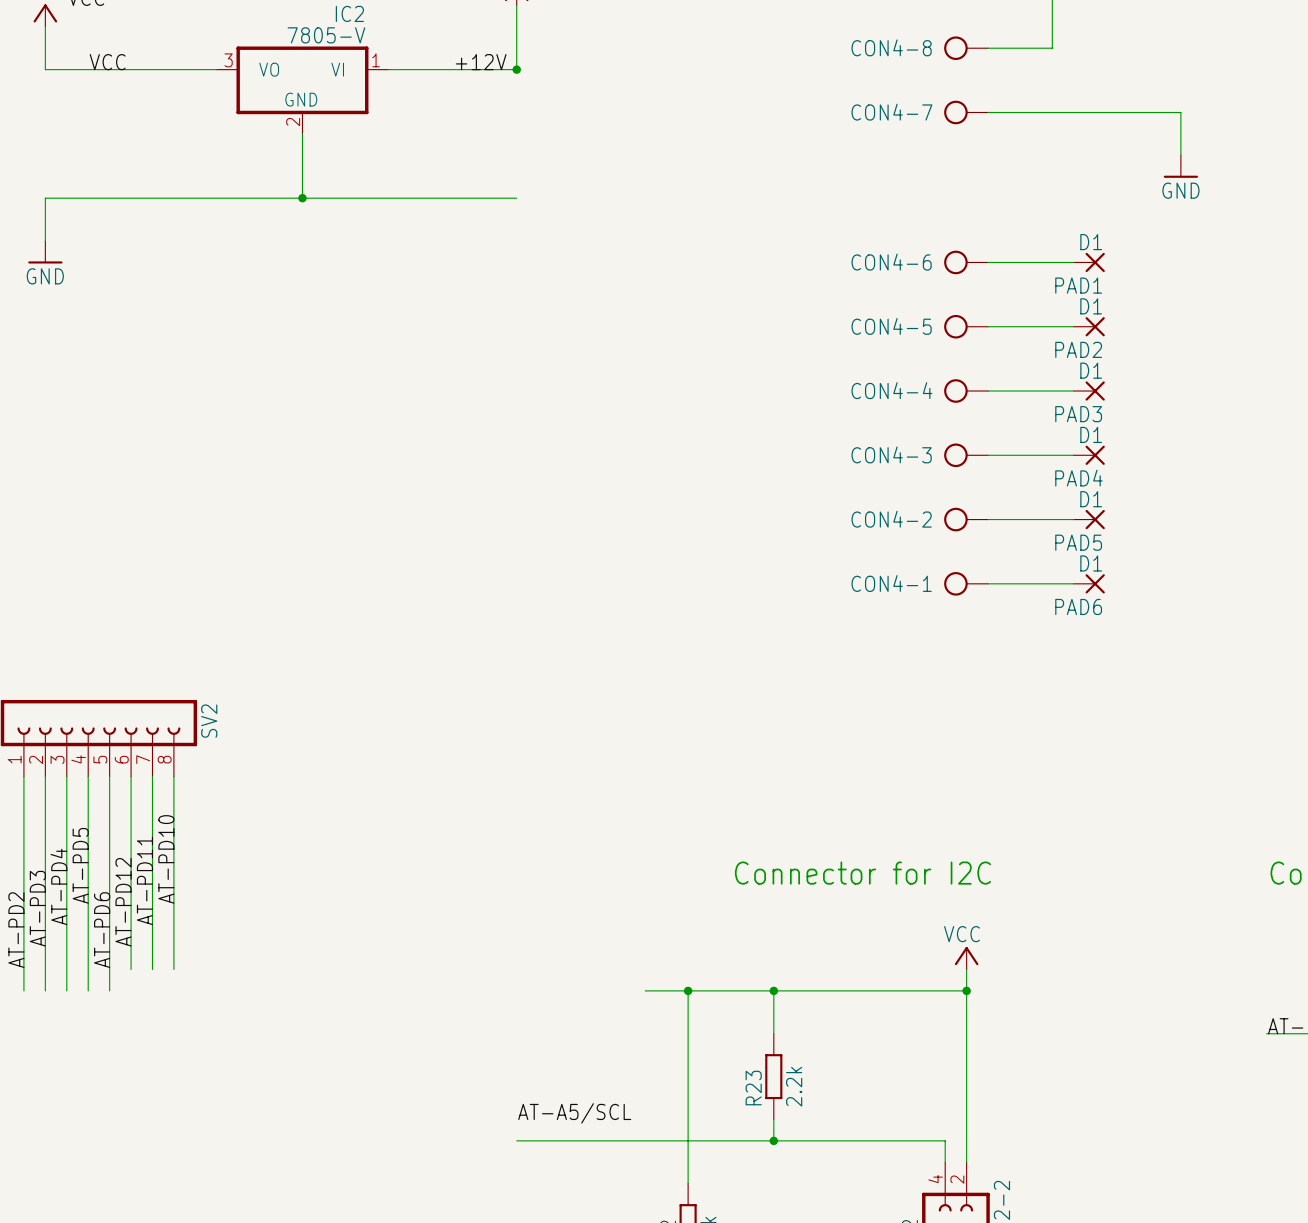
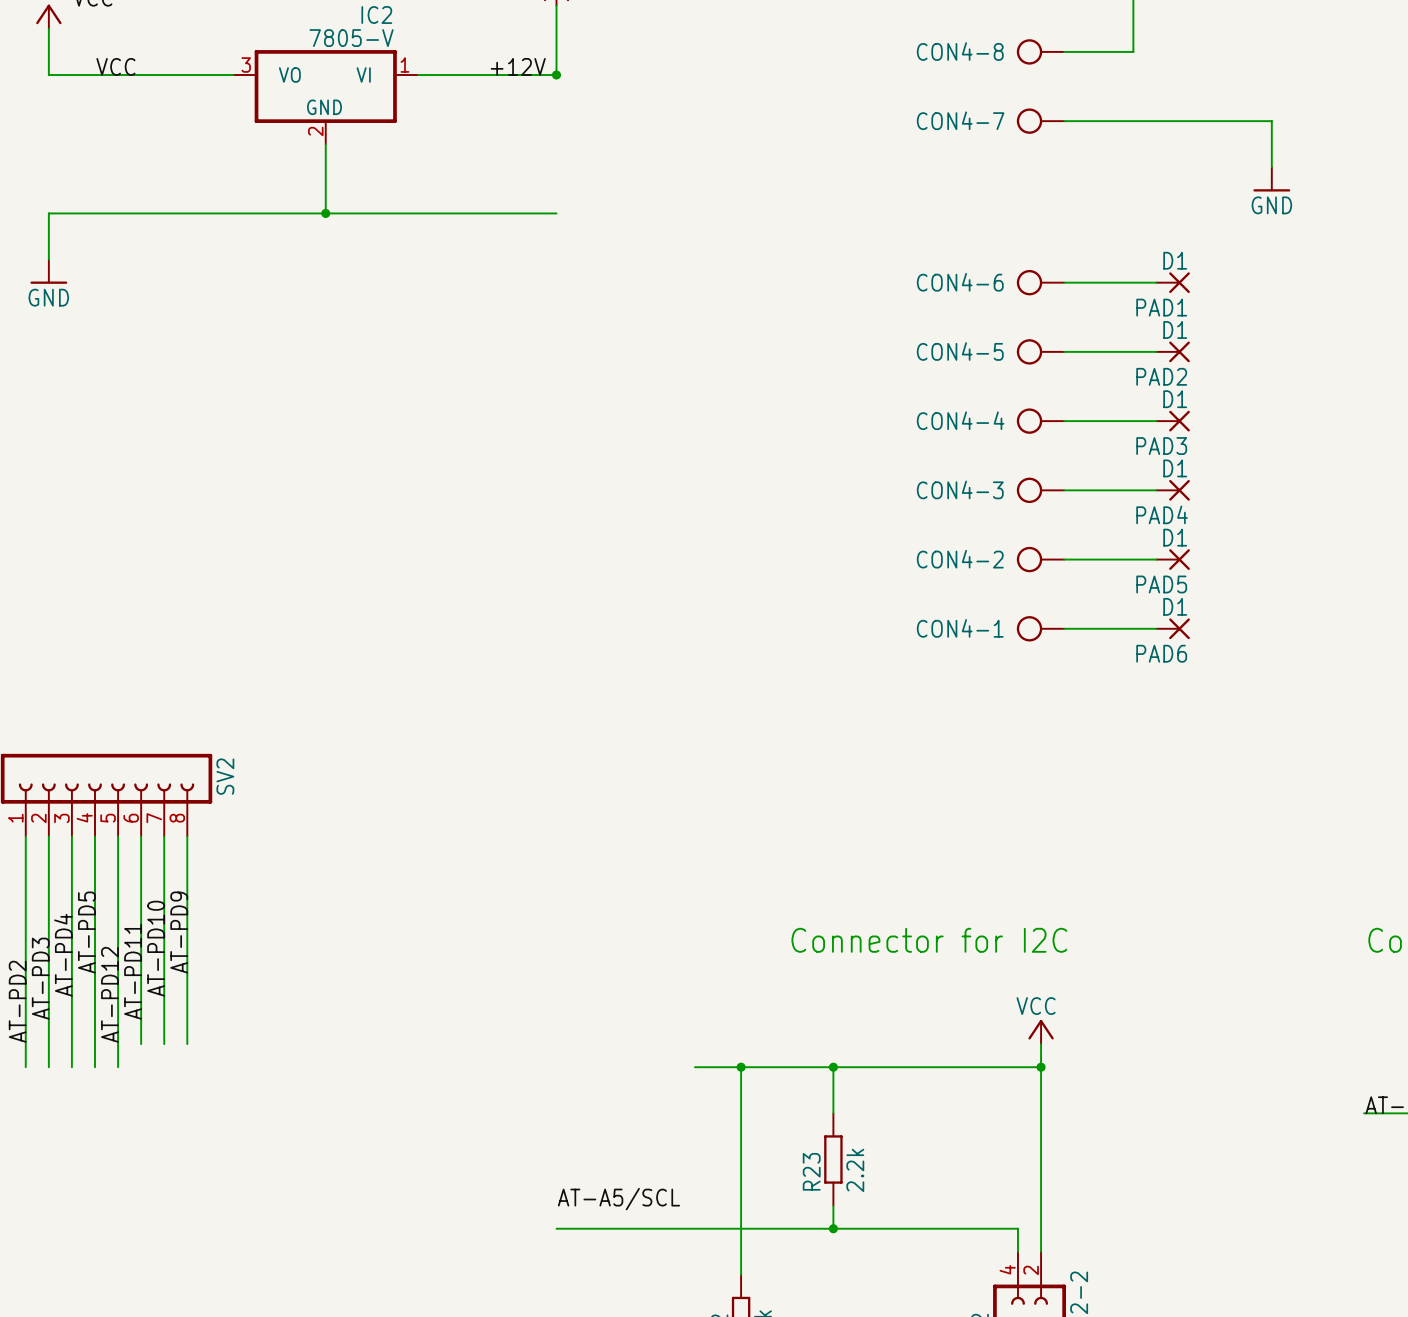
label: AT-PD10 (166, 859) -> AT-PD9 (179, 932)
label: AT-PD11 (144, 880) -> AT-PD10 (156, 948)
label: AT-PD12 (123, 902) -> AT-PD11 (133, 971)
label: AT-PD6 (102, 930) -> AT-PD12 (110, 994)

